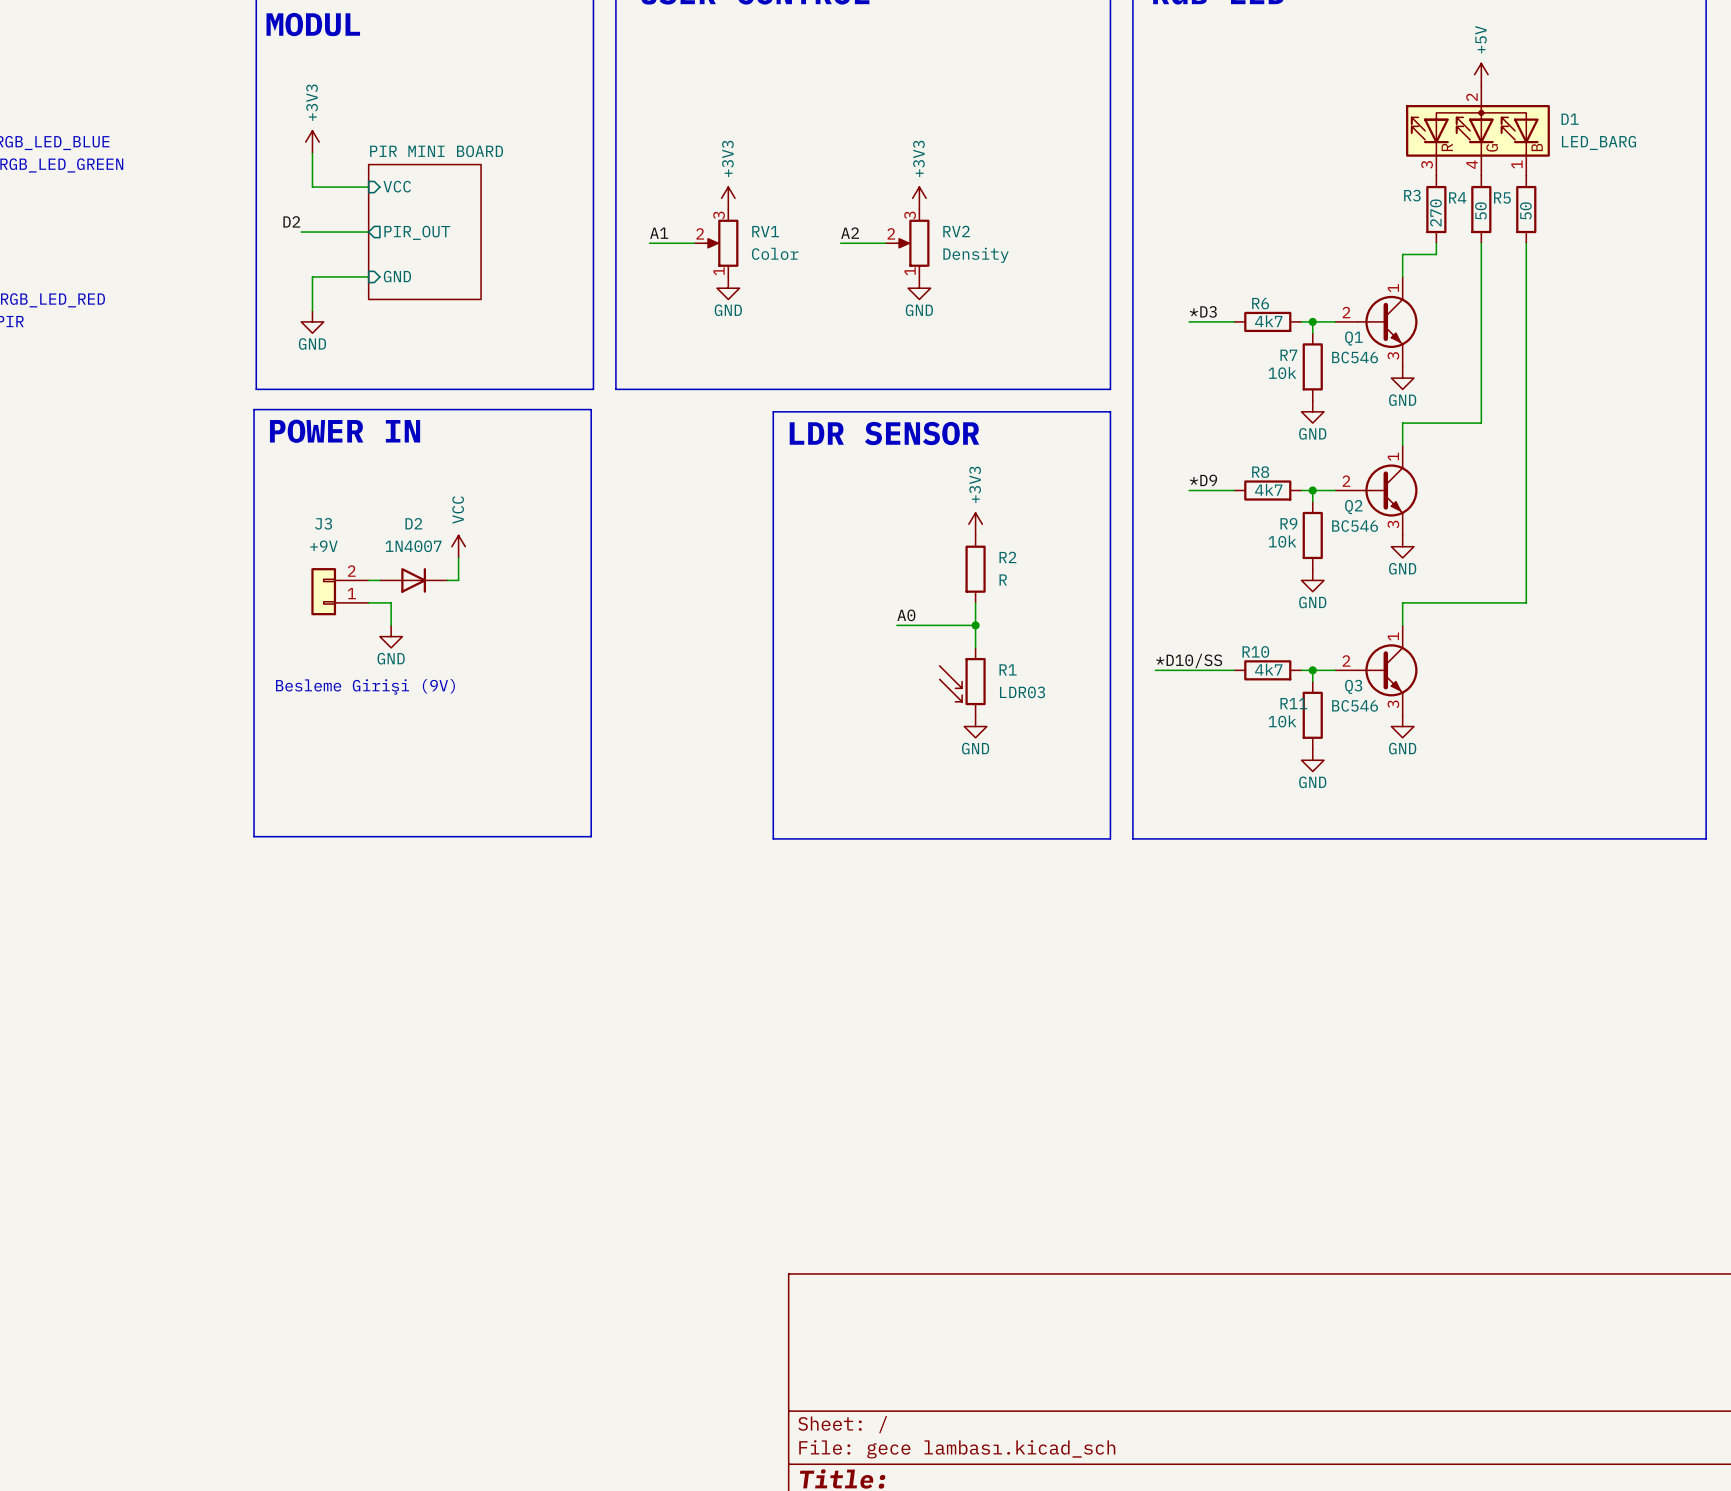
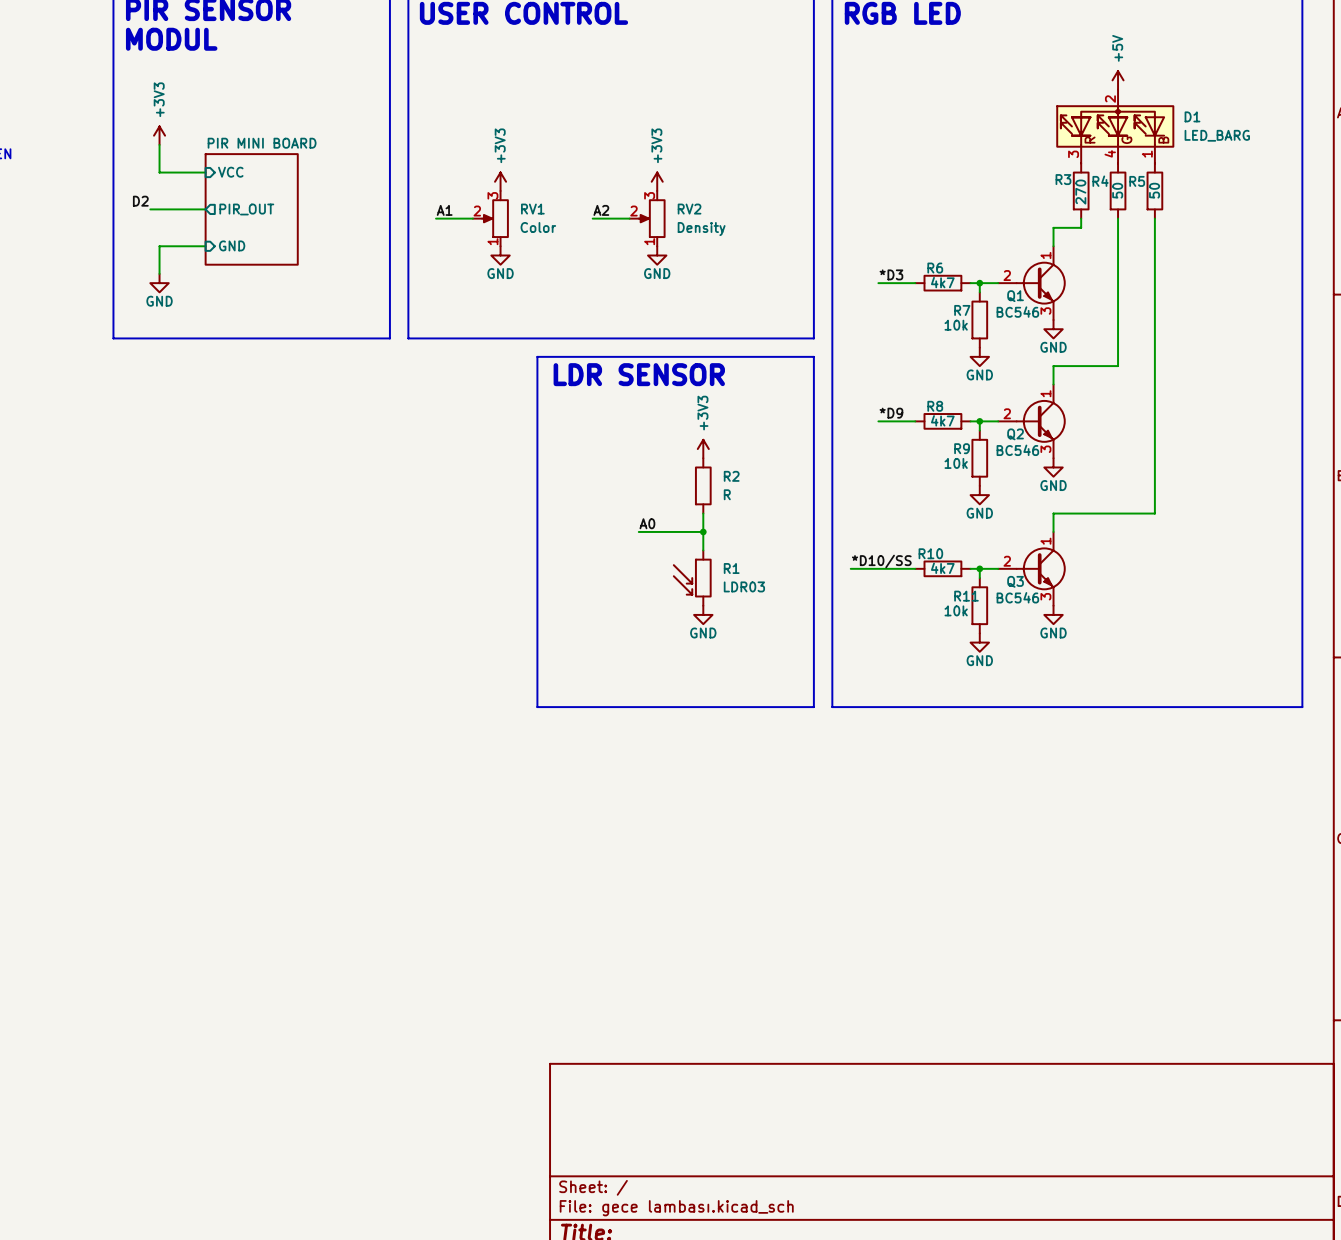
line: (254, 409) (591, 409) (591, 836) (254, 836) (254, 409) -> none
text: POWER IN (345, 431) -> none
power symbol: VCC (458, 546) -> none
wire: (458, 557) (458, 580) (447, 580) -> none
wire: (368, 580) (379, 580) -> none
D2: 1N4007 (413, 580) -> none
J3: +9V (340, 591) -> none
wire: (368, 602) (391, 602) (391, 625) -> none
power symbol: GND (391, 636) -> none
text: Besleme Girişi (9V) (365, 686) -> none

